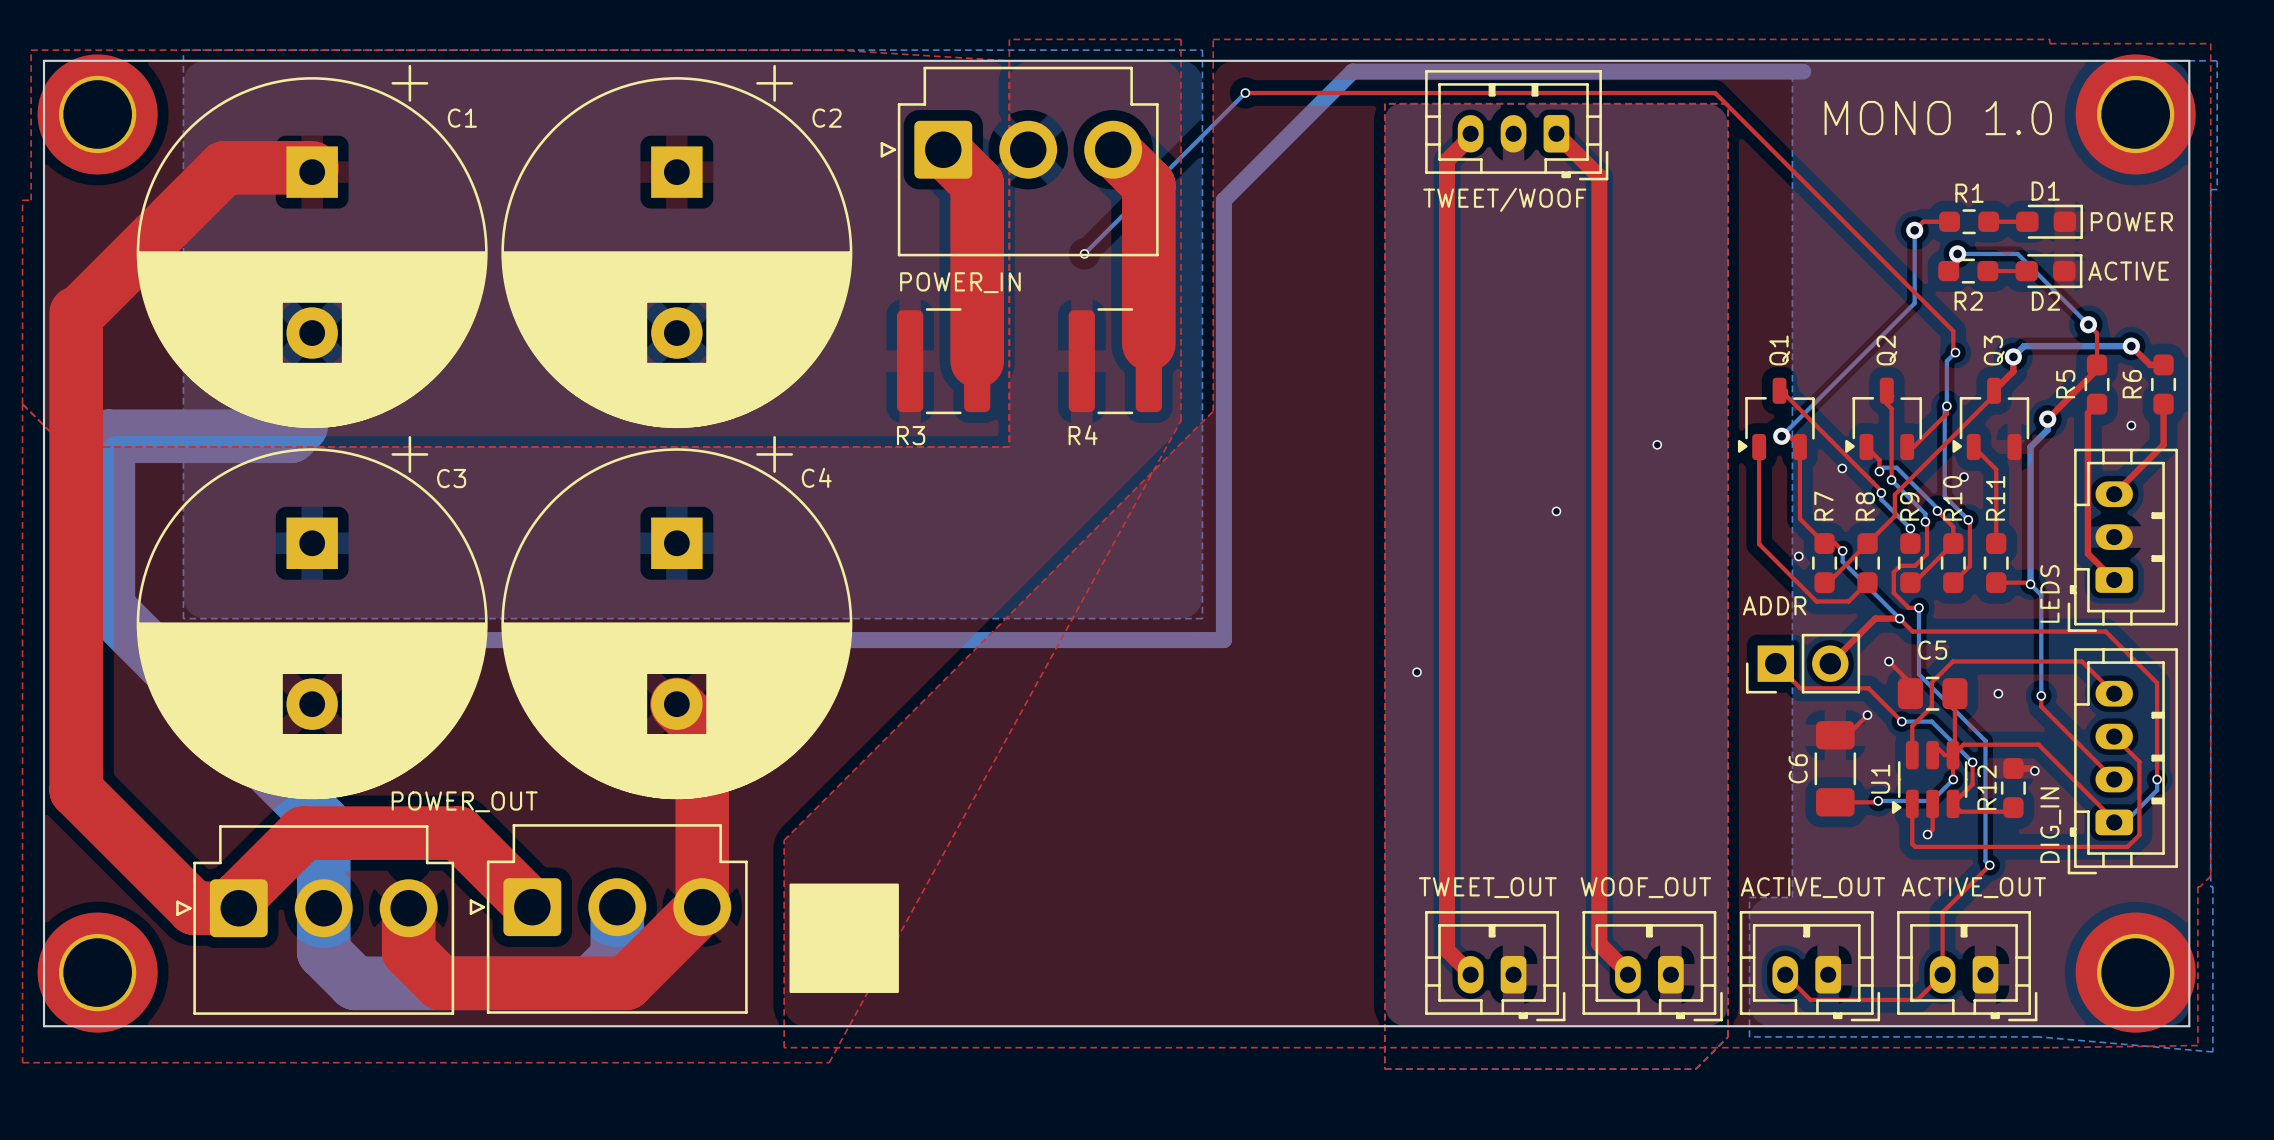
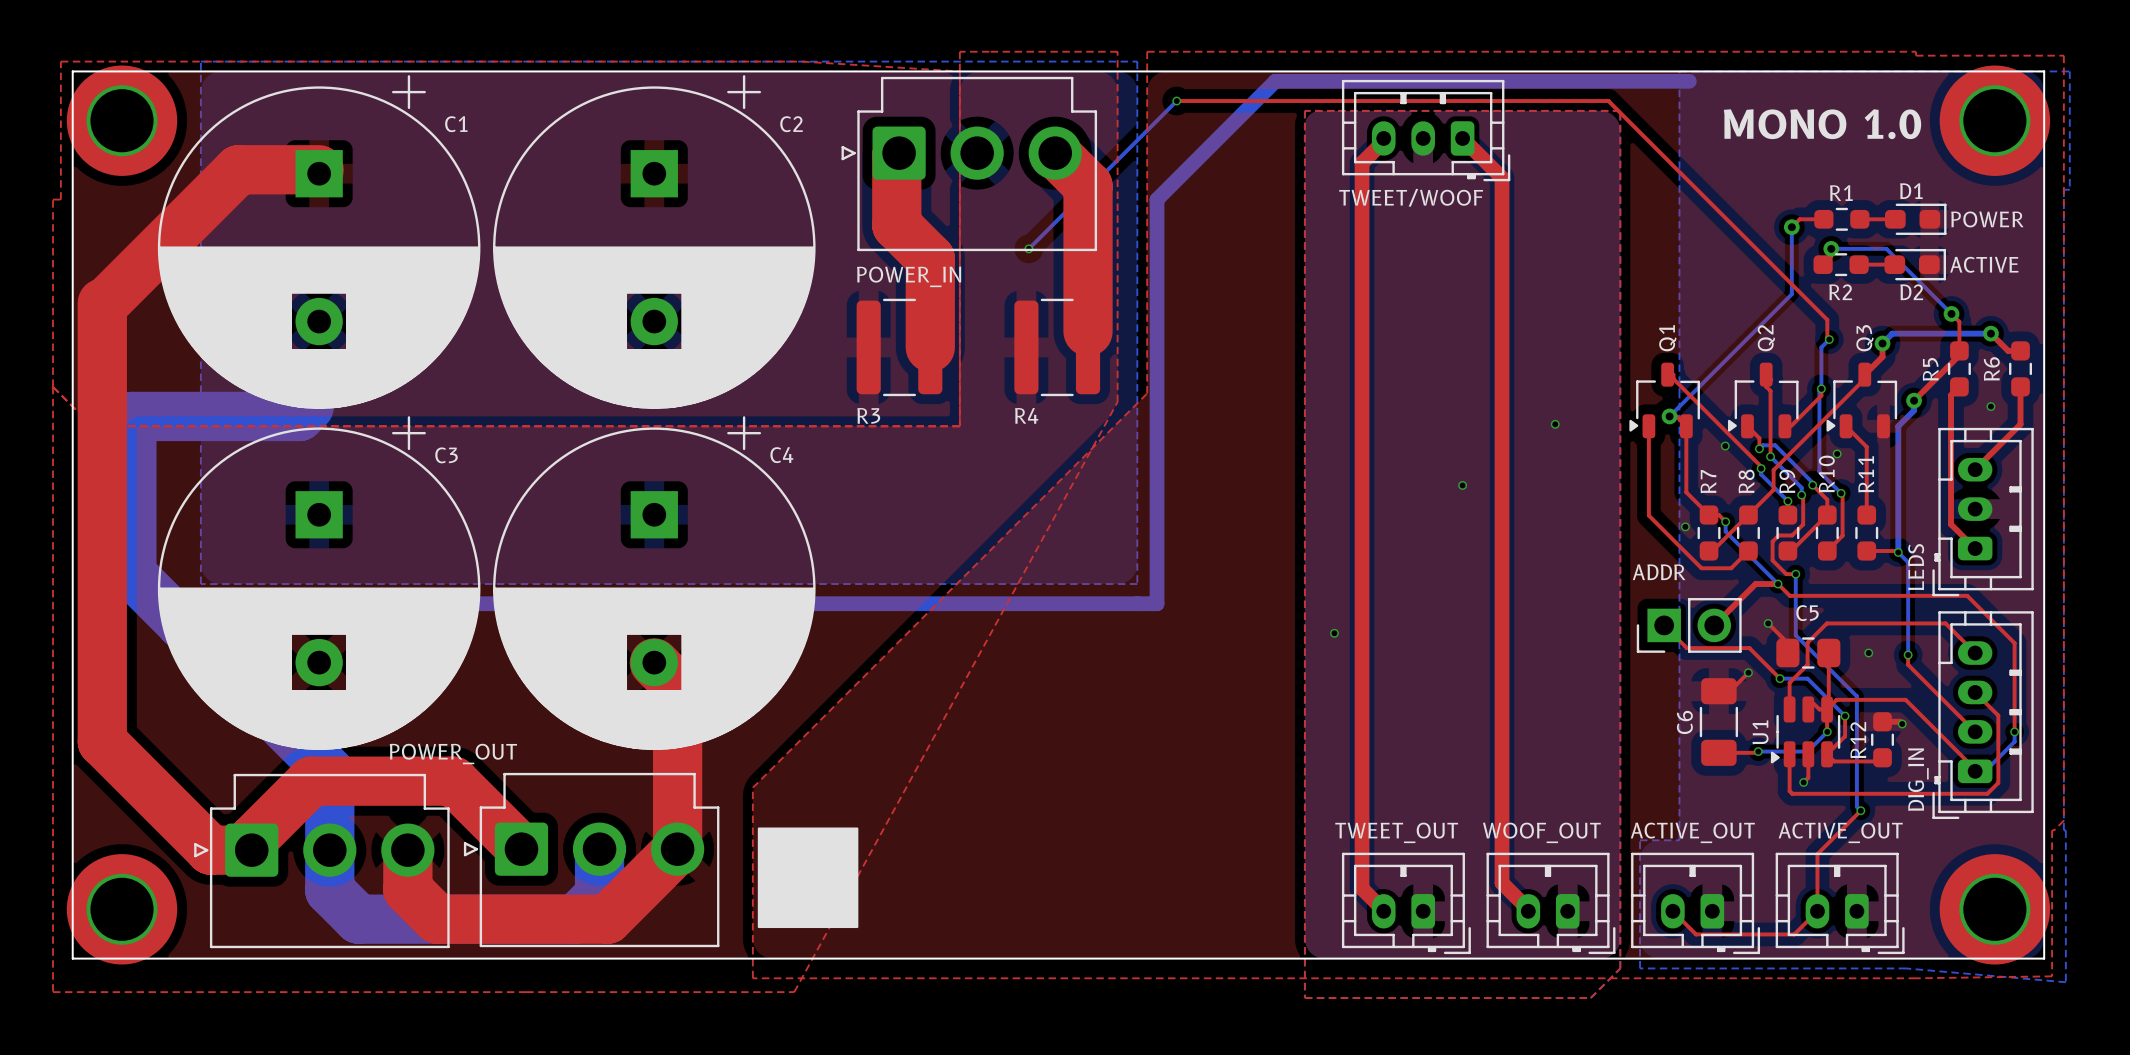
top track: (943, 149) (977, 183) (977, 264) -> (899, 153) (896, 155) (896, 225) (930, 258)

